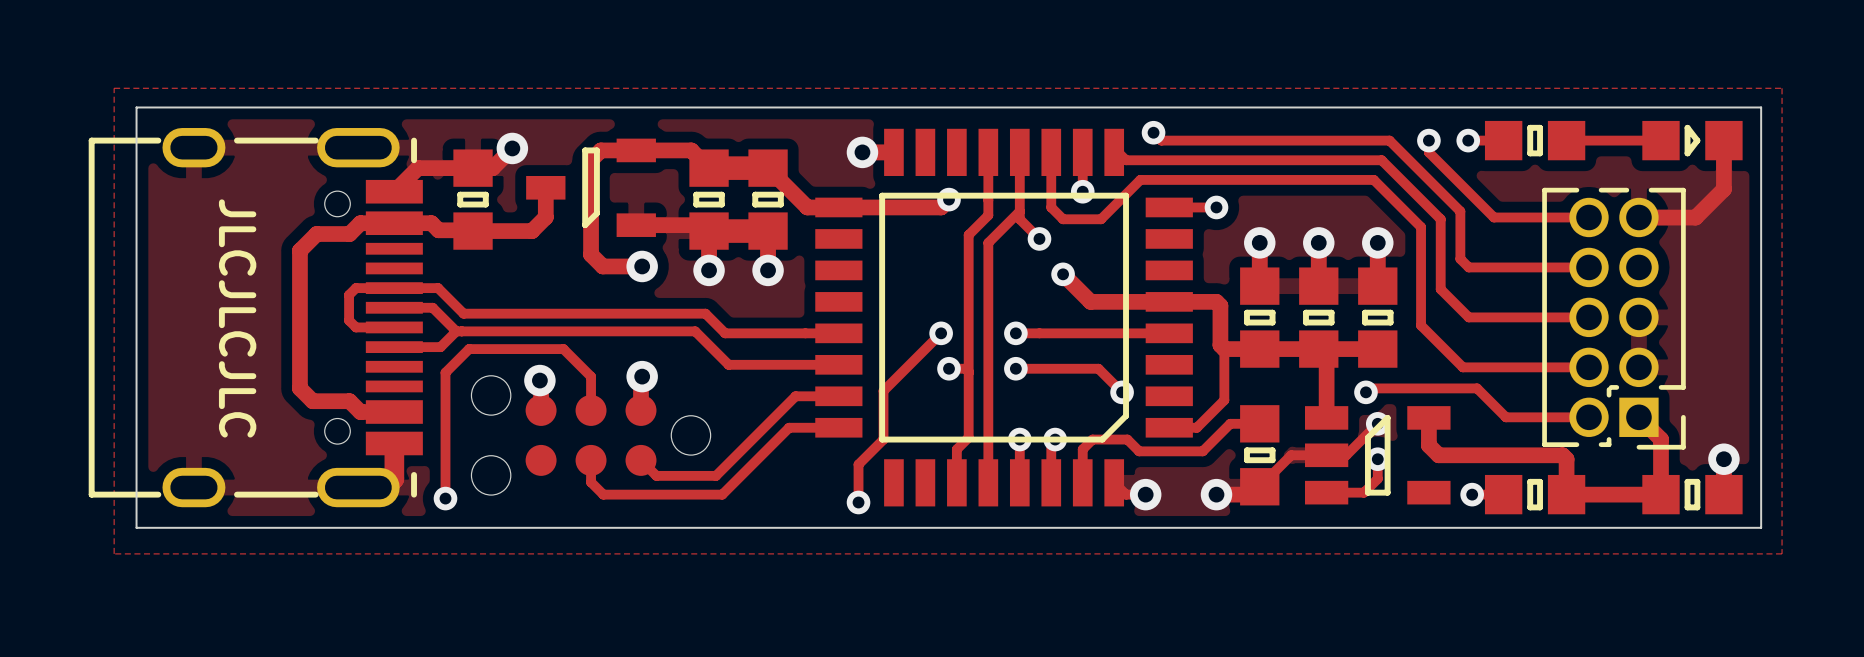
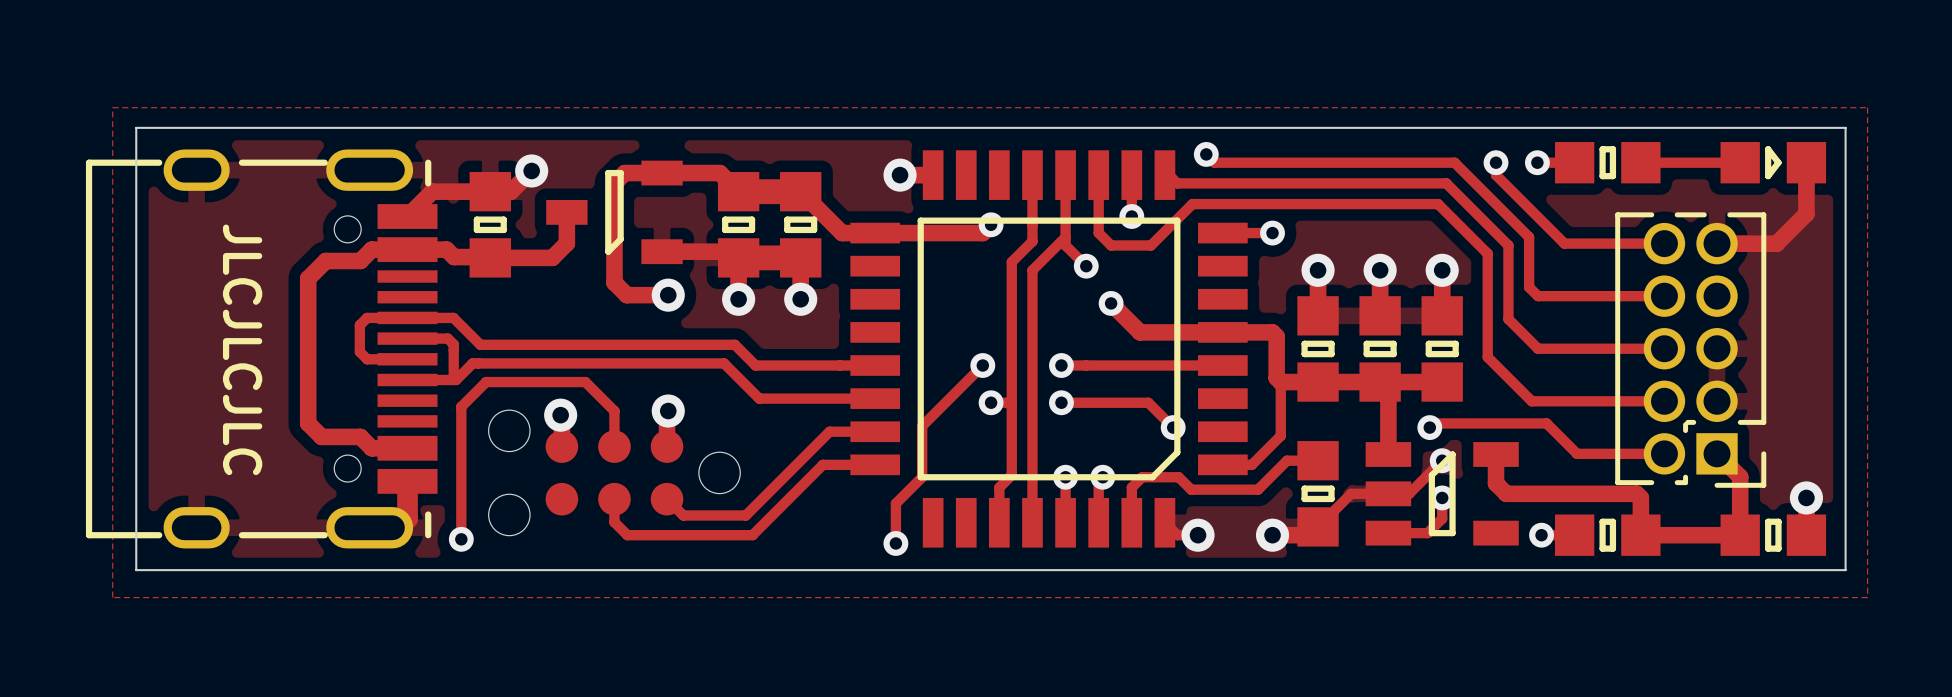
track: (438, 313) (456, 331) -> (453, 344) (453, 379)

